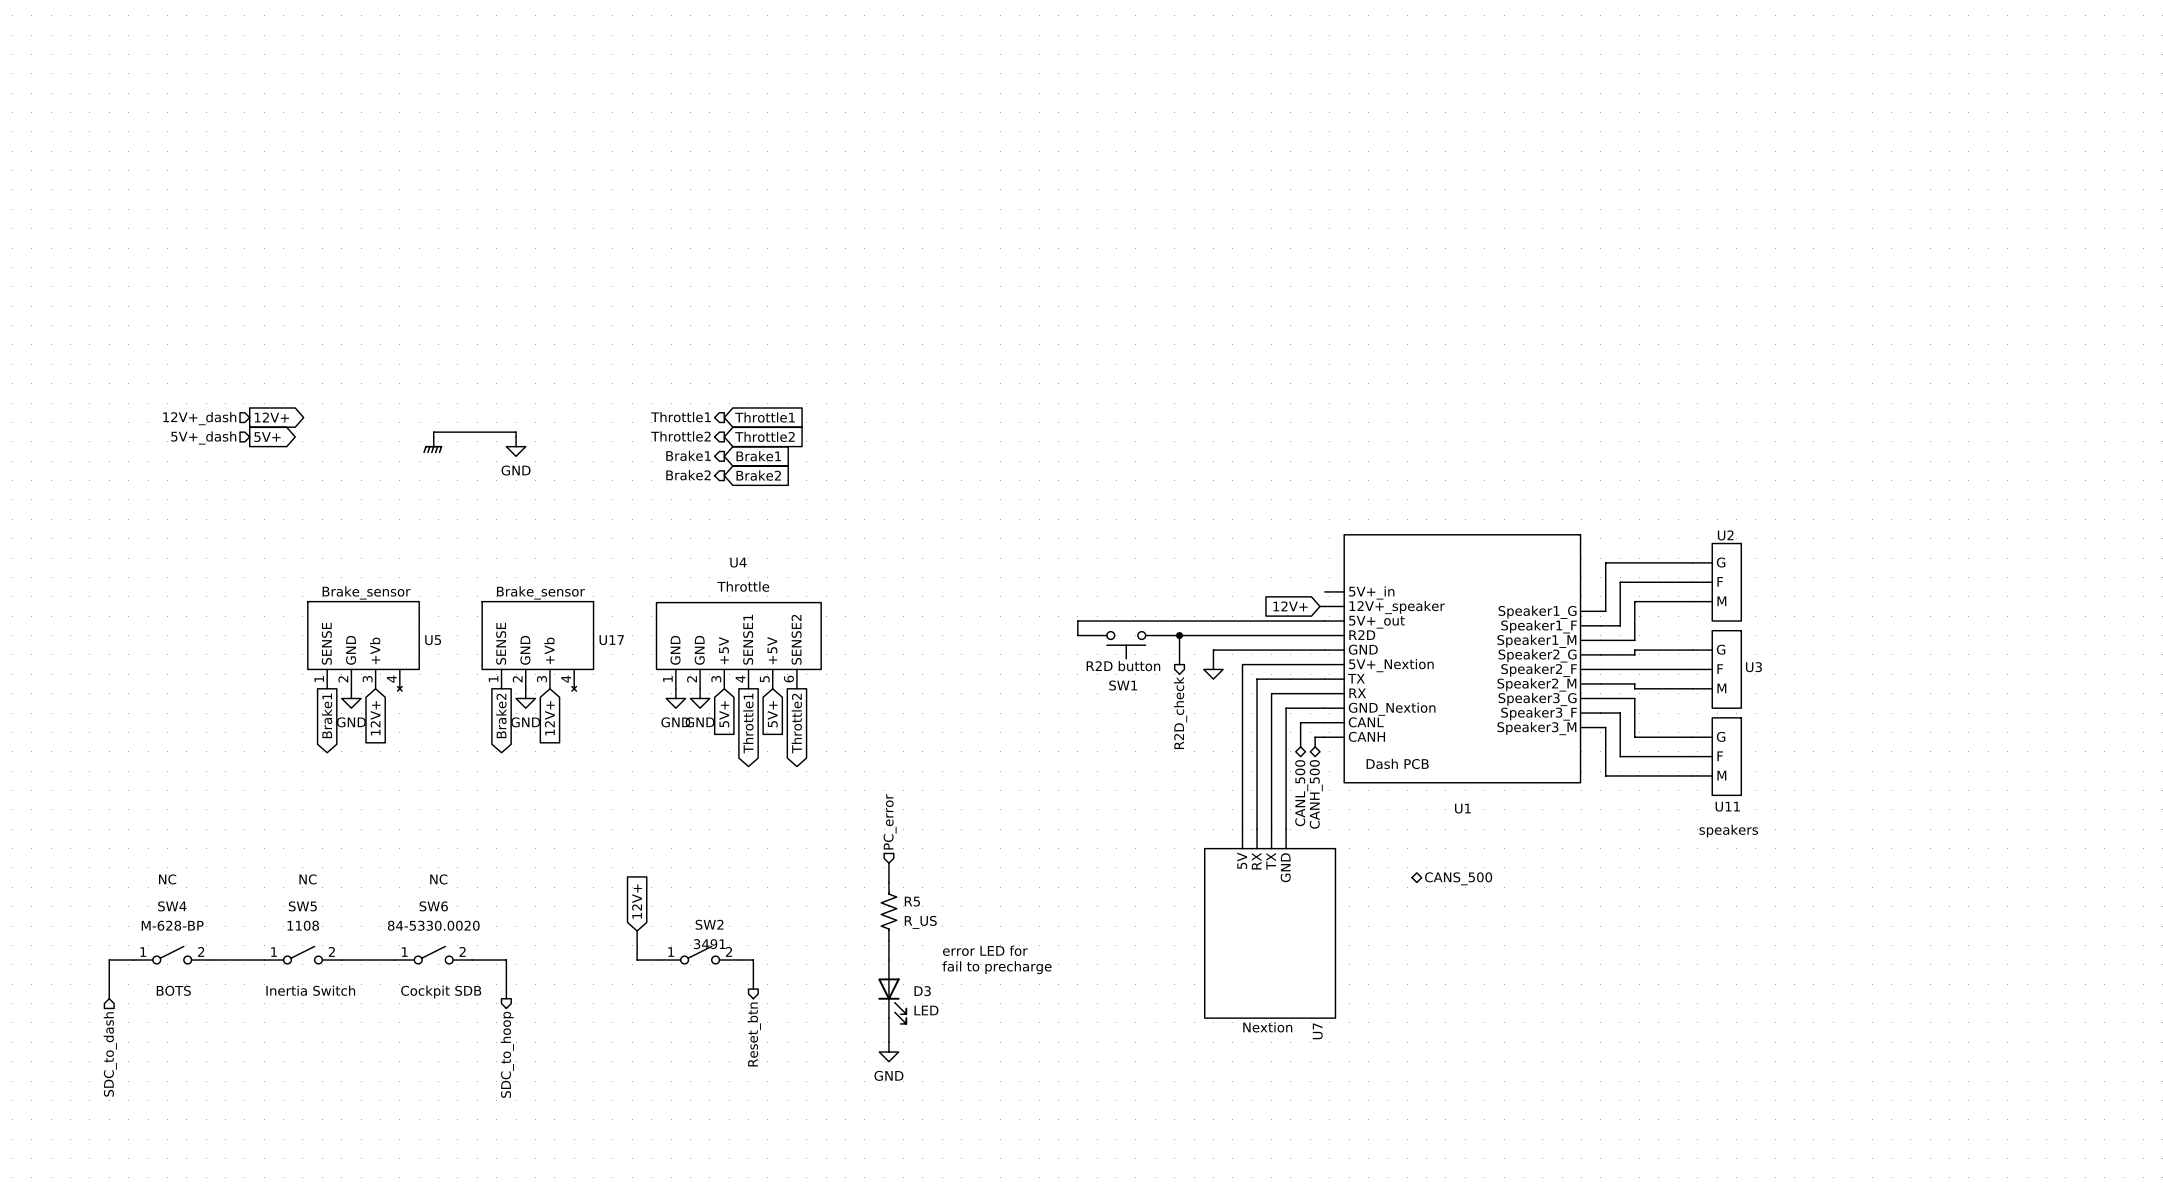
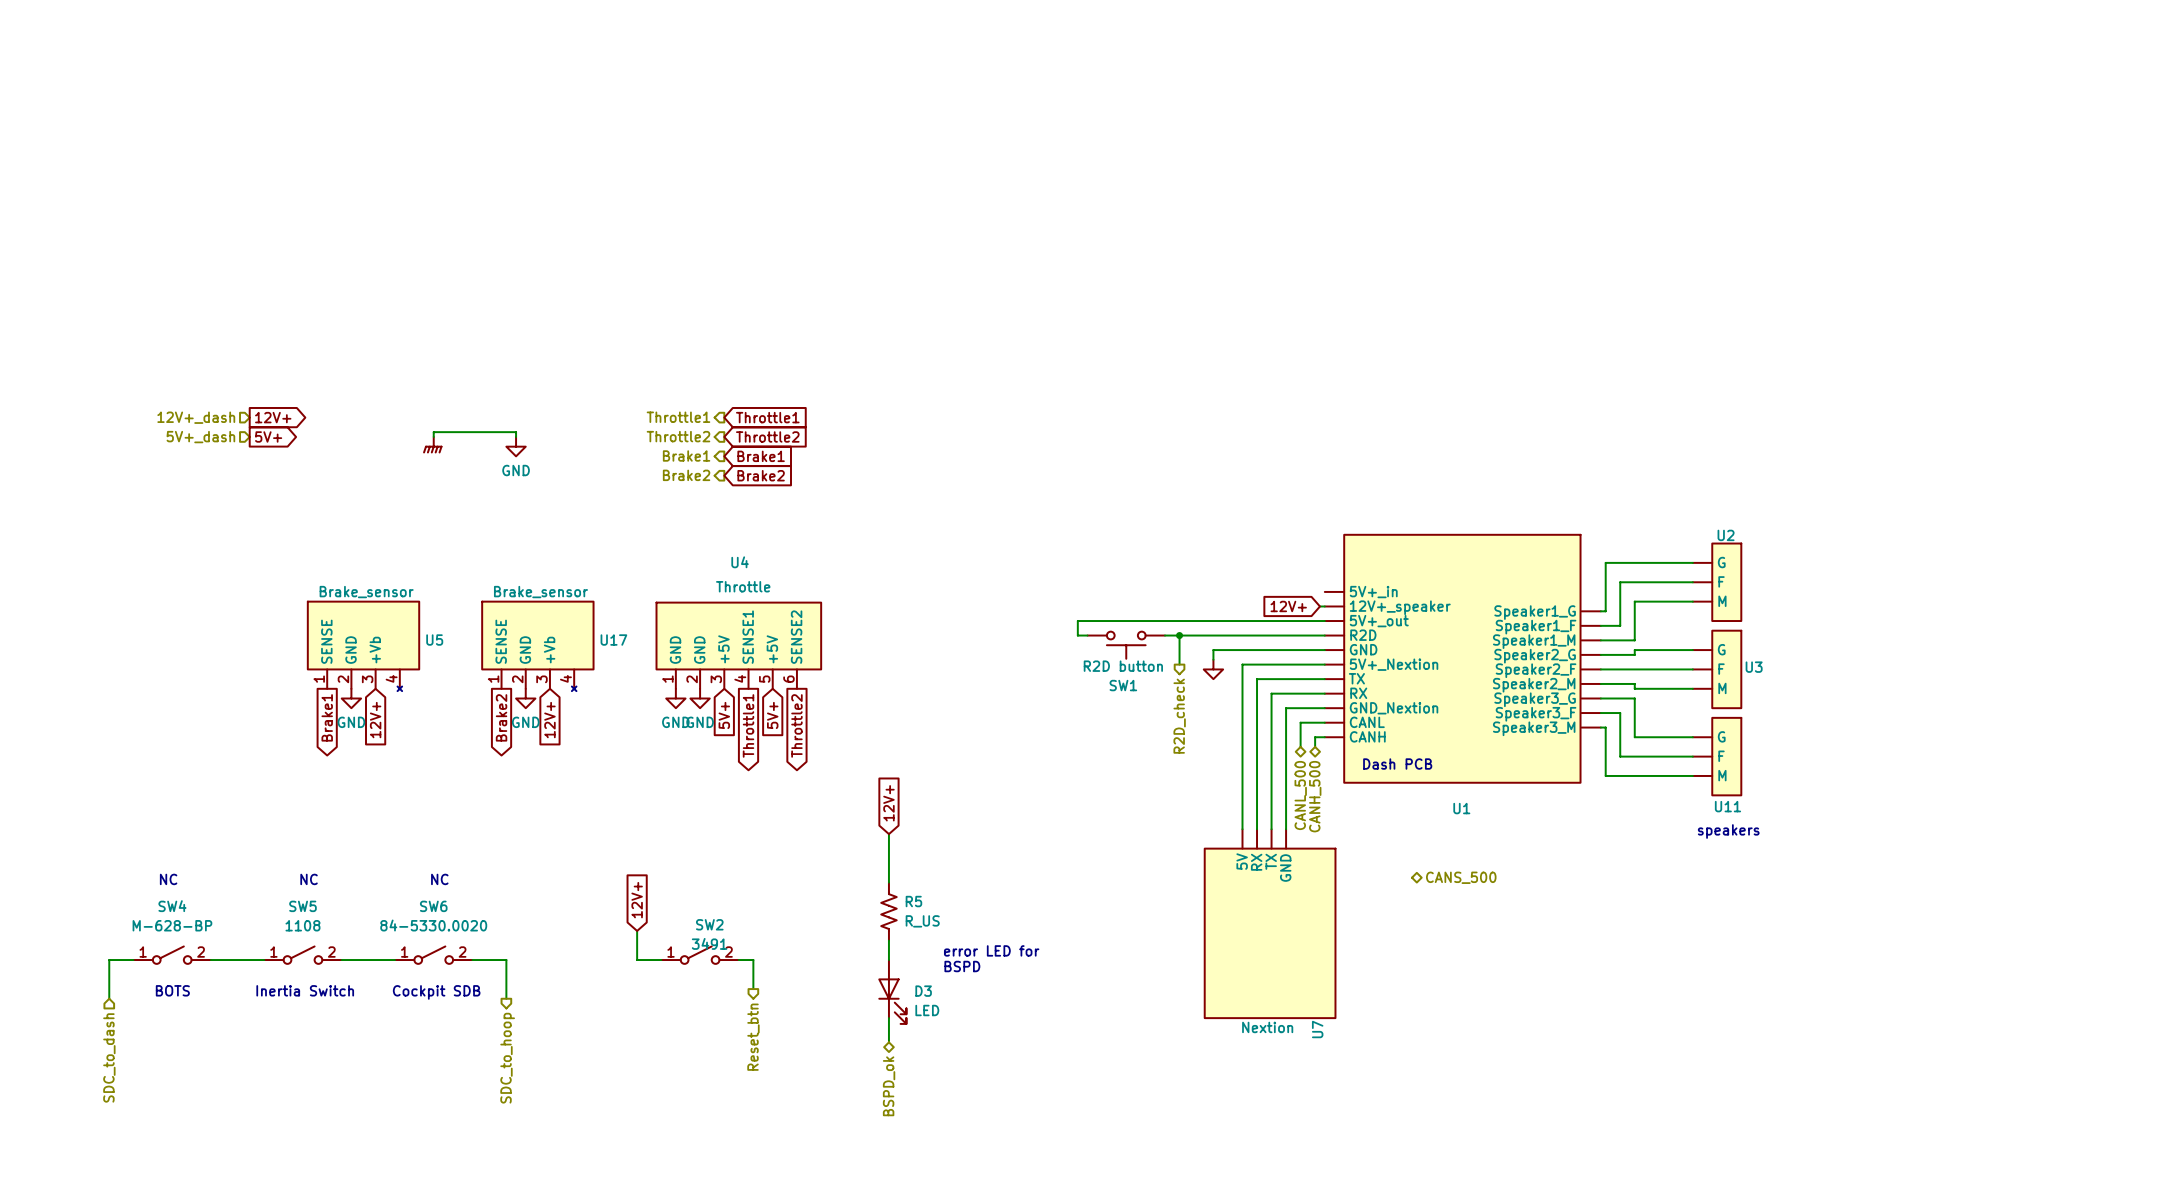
global label: none -> 12V+ (888, 803)
hierarchical label: PC_error (890, 821) -> none
wire: none -> (888, 834) (888, 863)
text: fail to precharge (997, 967) -> BSPD (962, 966)
power symbol: GND (888, 1052) -> none
hierarchical label: none -> BSPD_ok (889, 1086)

